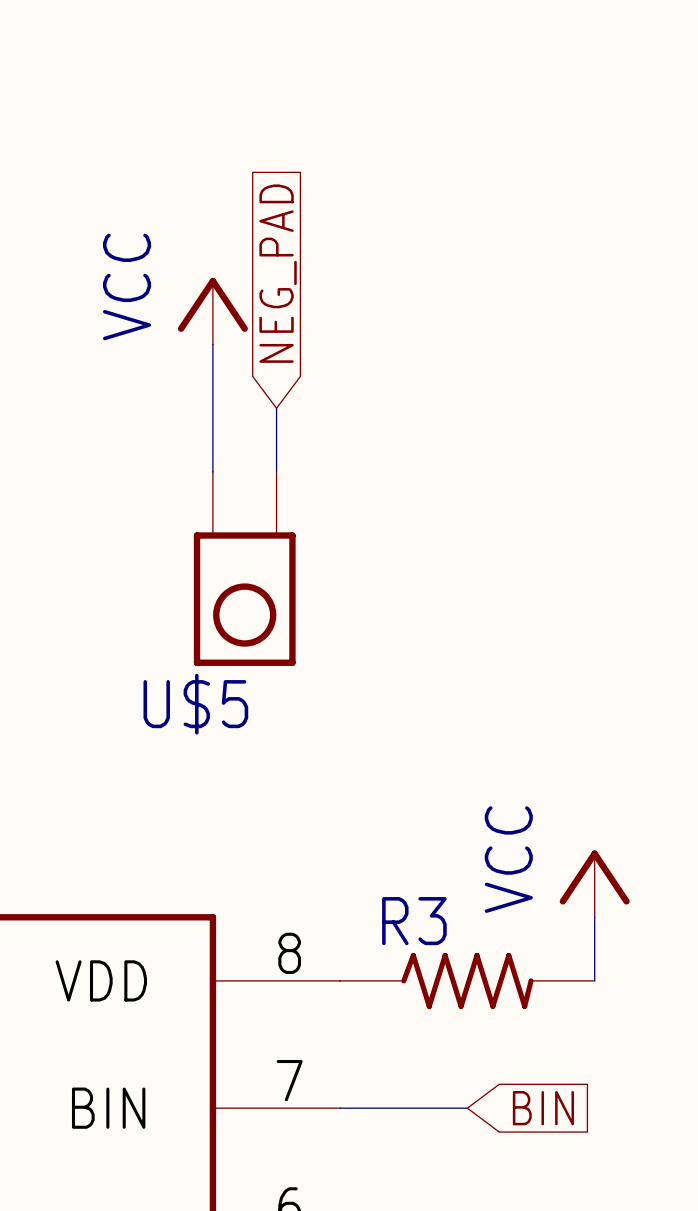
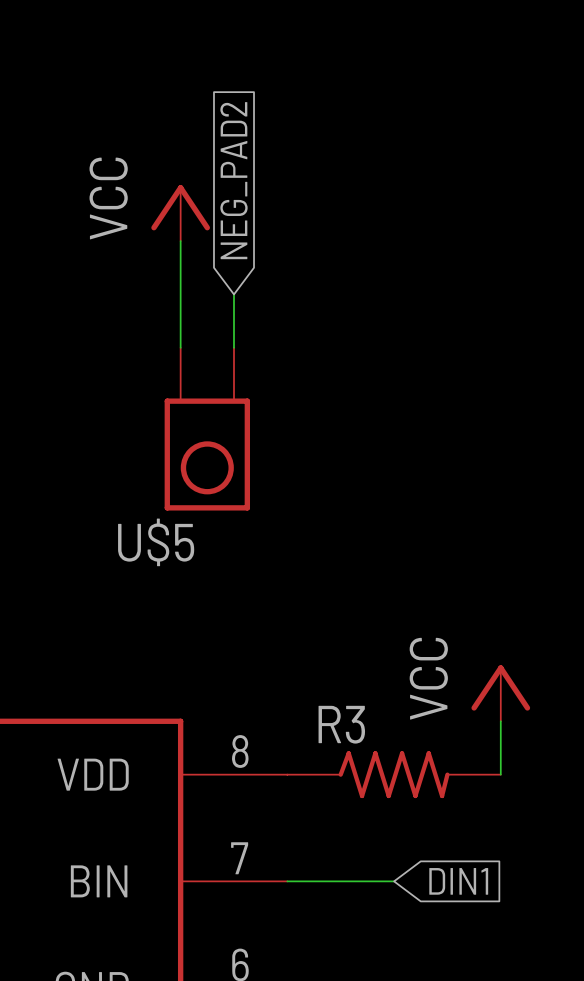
global label: NEG_PAD (278, 273) -> NEG_PAD2 (234, 180)
global label: BIN (543, 1108) -> DIN1 (458, 881)

